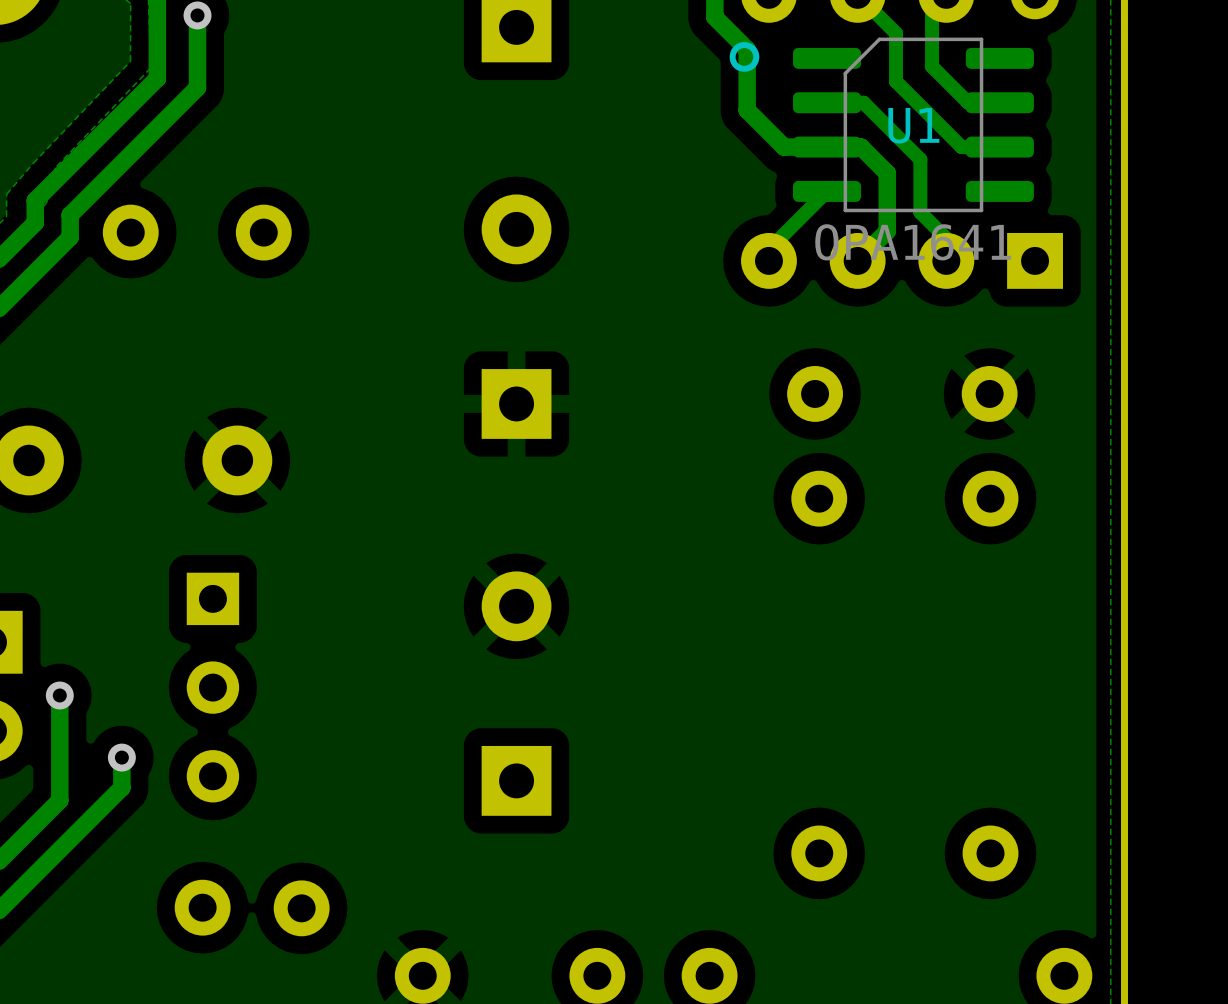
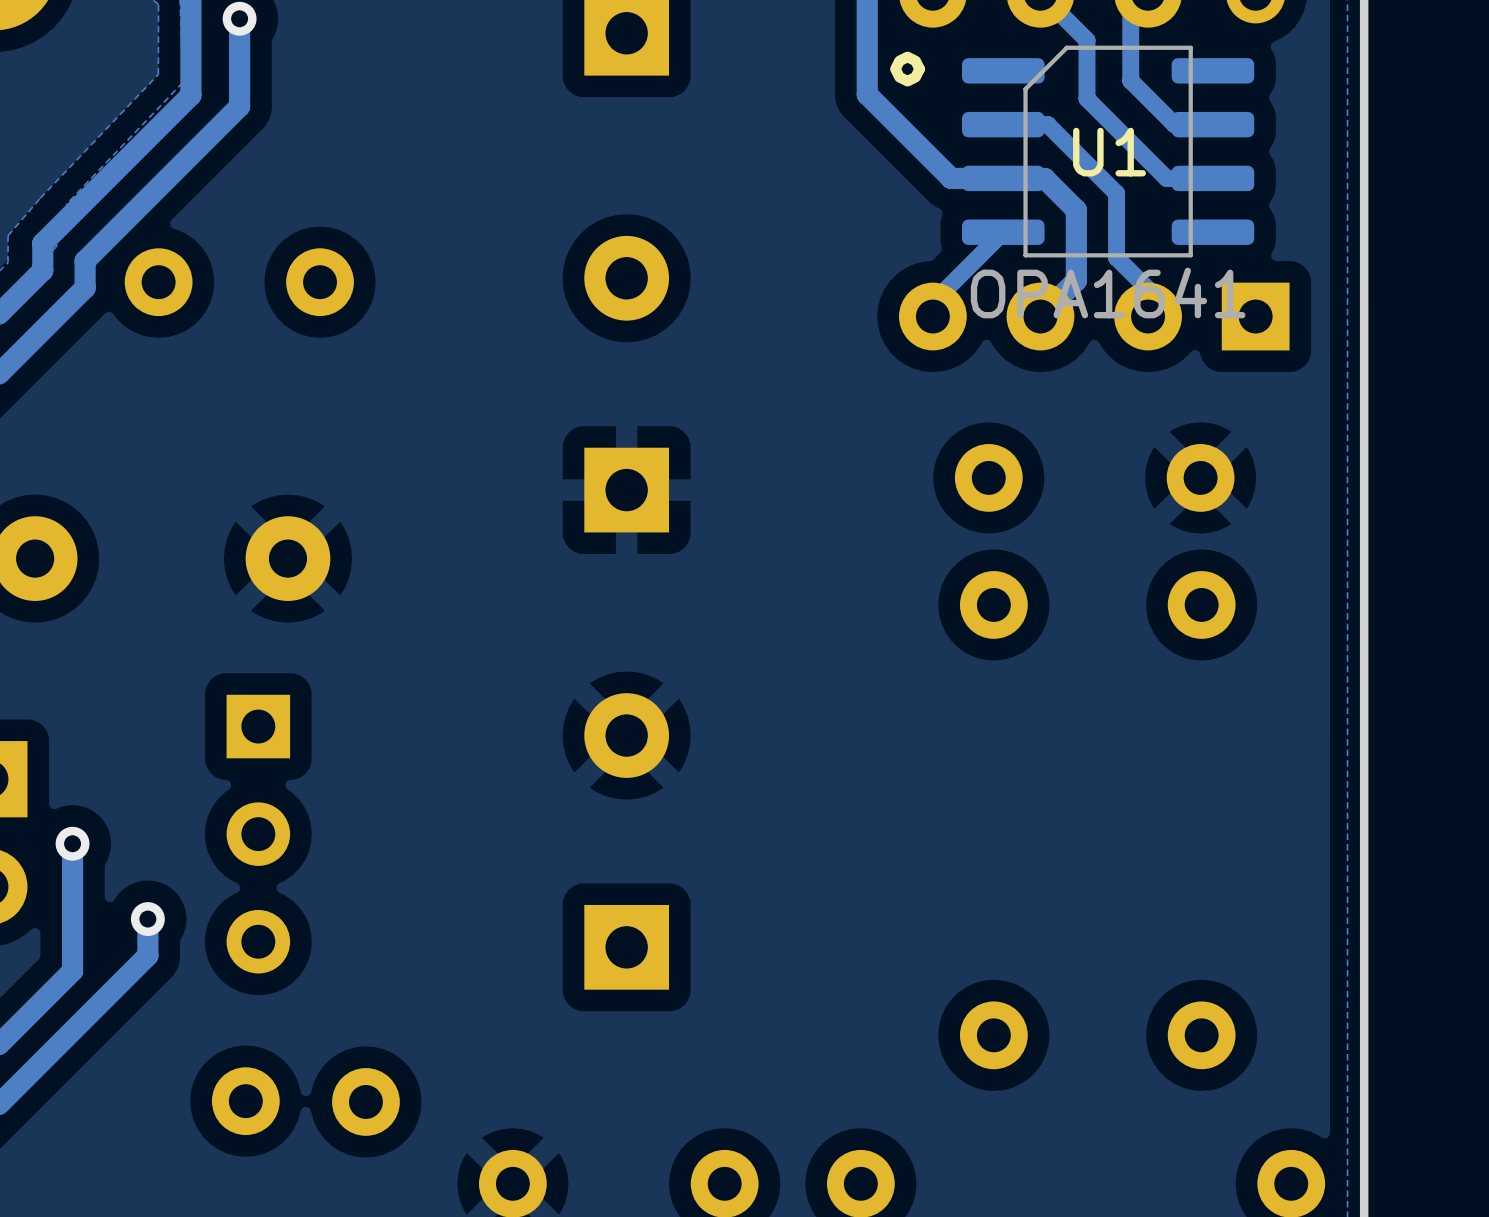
track: (714, 17) (747, 49) (747, 110) -> (867, 20) (867, 94) (906, 133)

